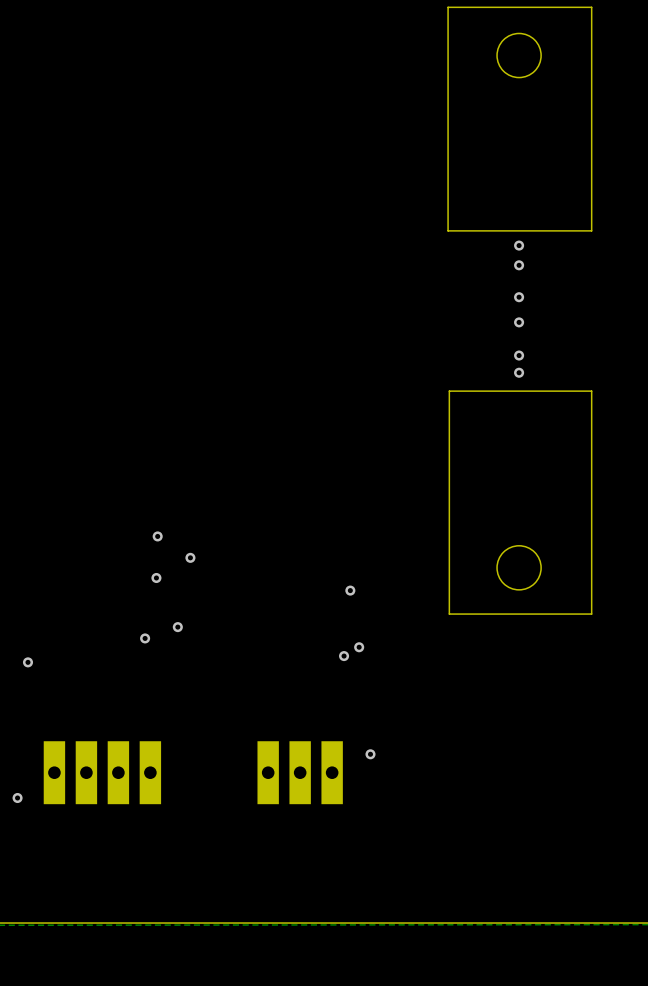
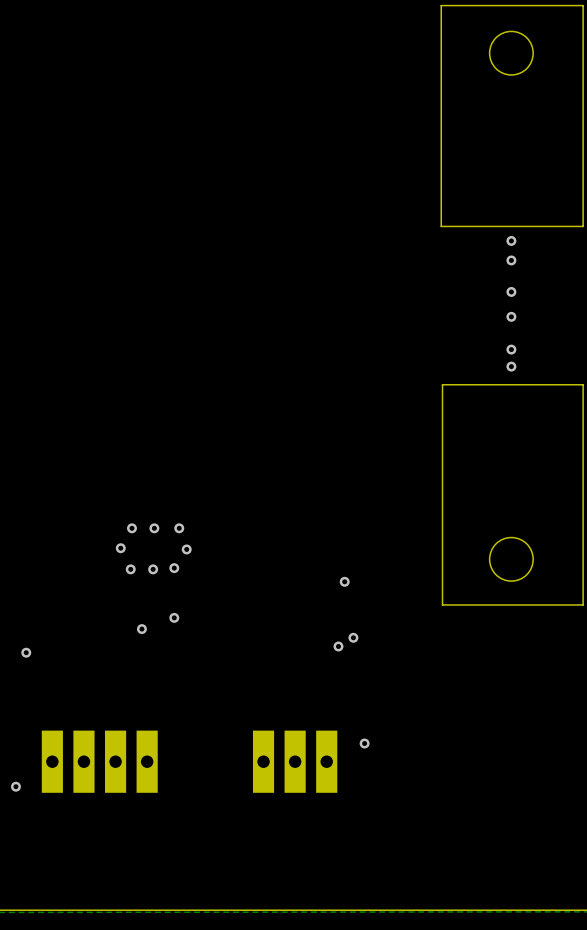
via: none -> (131, 528)
via: none -> (179, 528)
via: none -> (120, 548)
via: none -> (174, 568)
via: none -> (130, 569)

